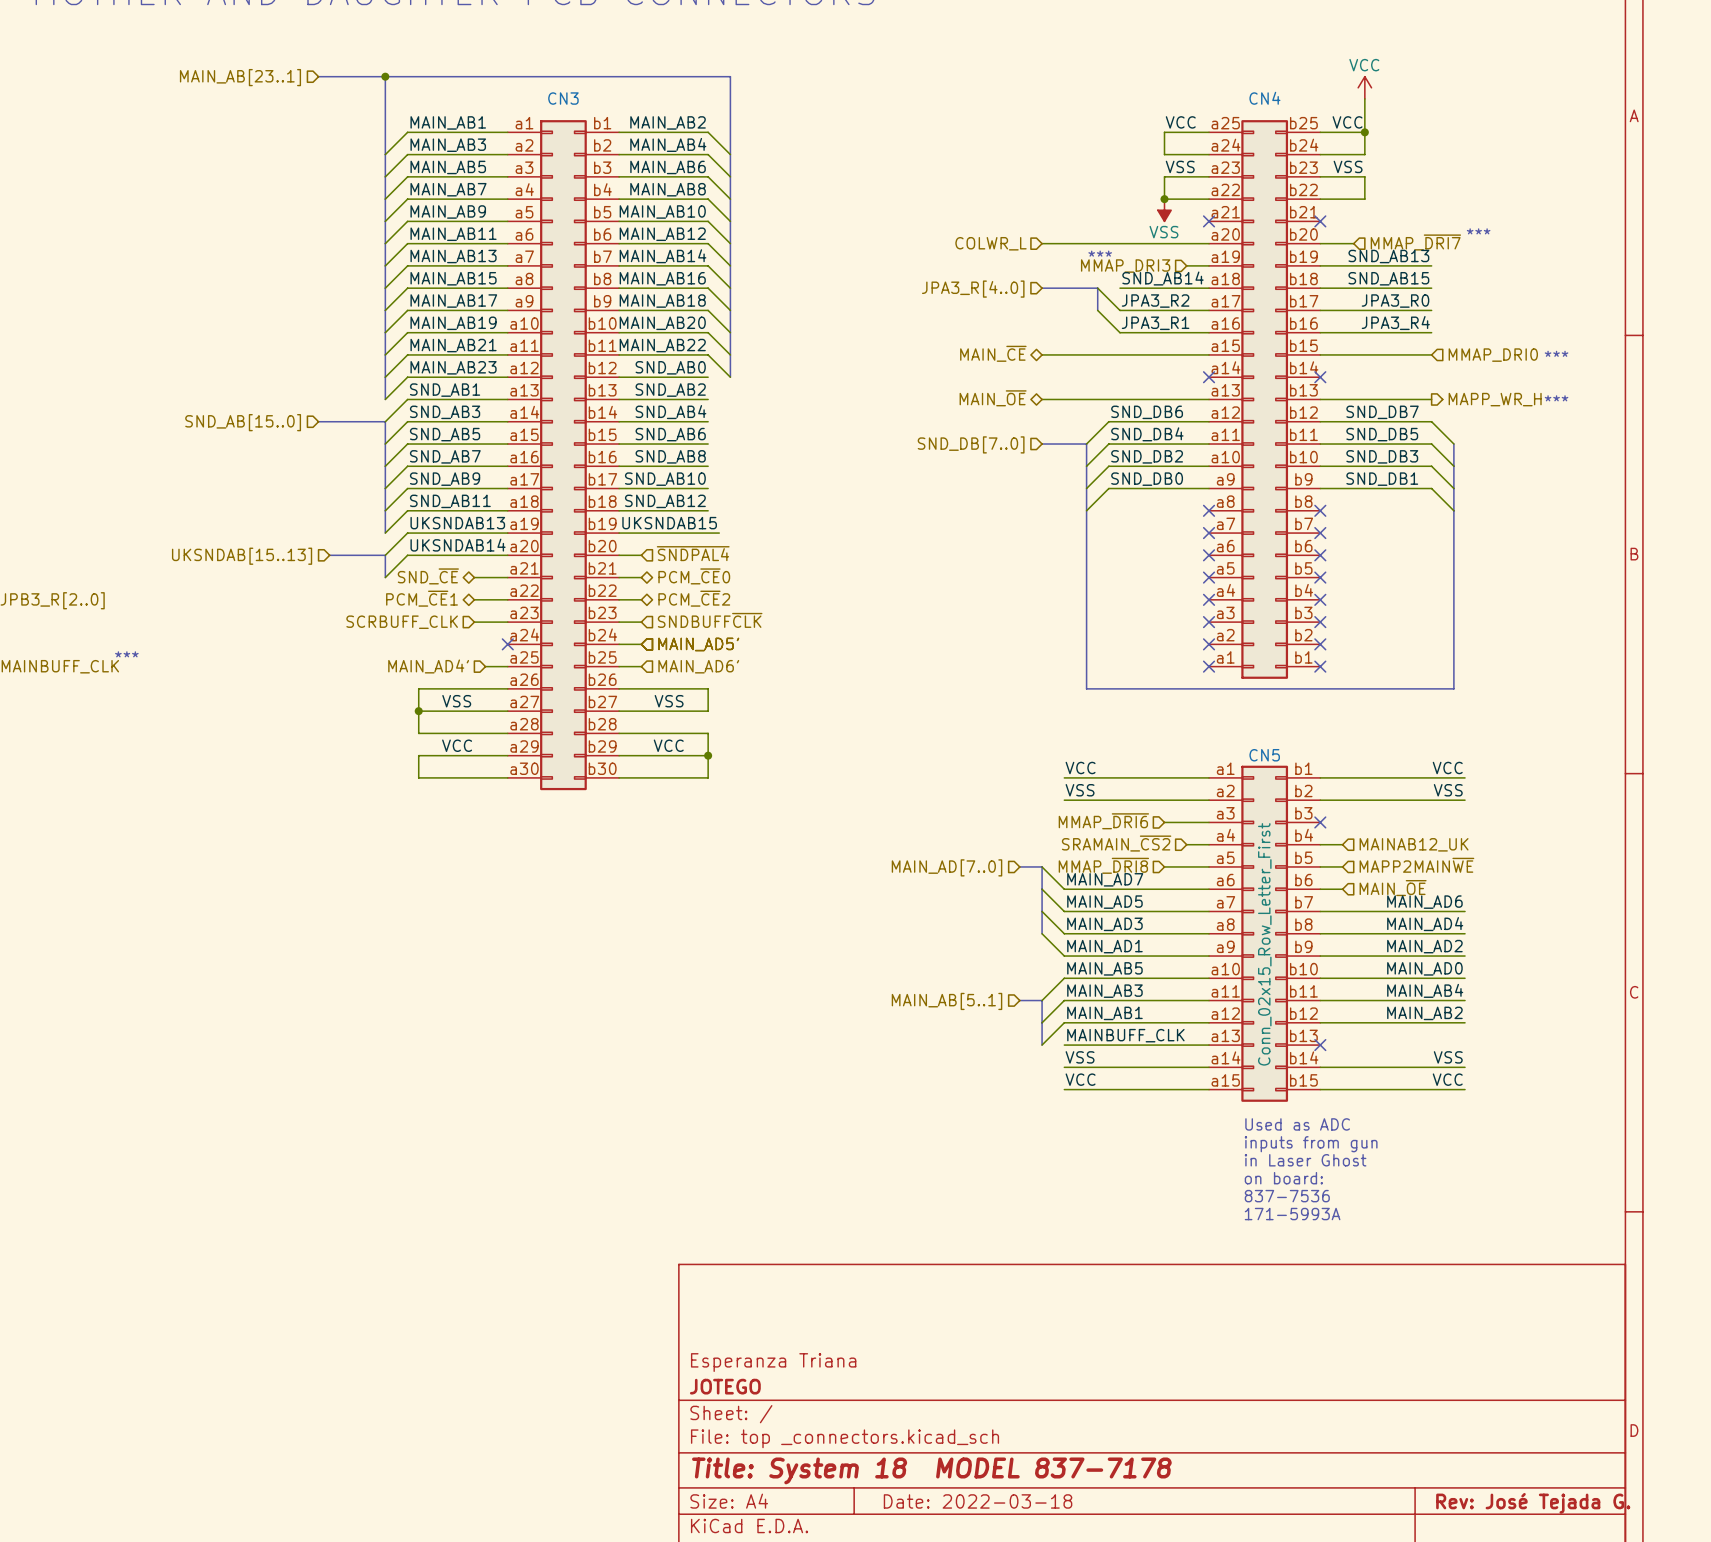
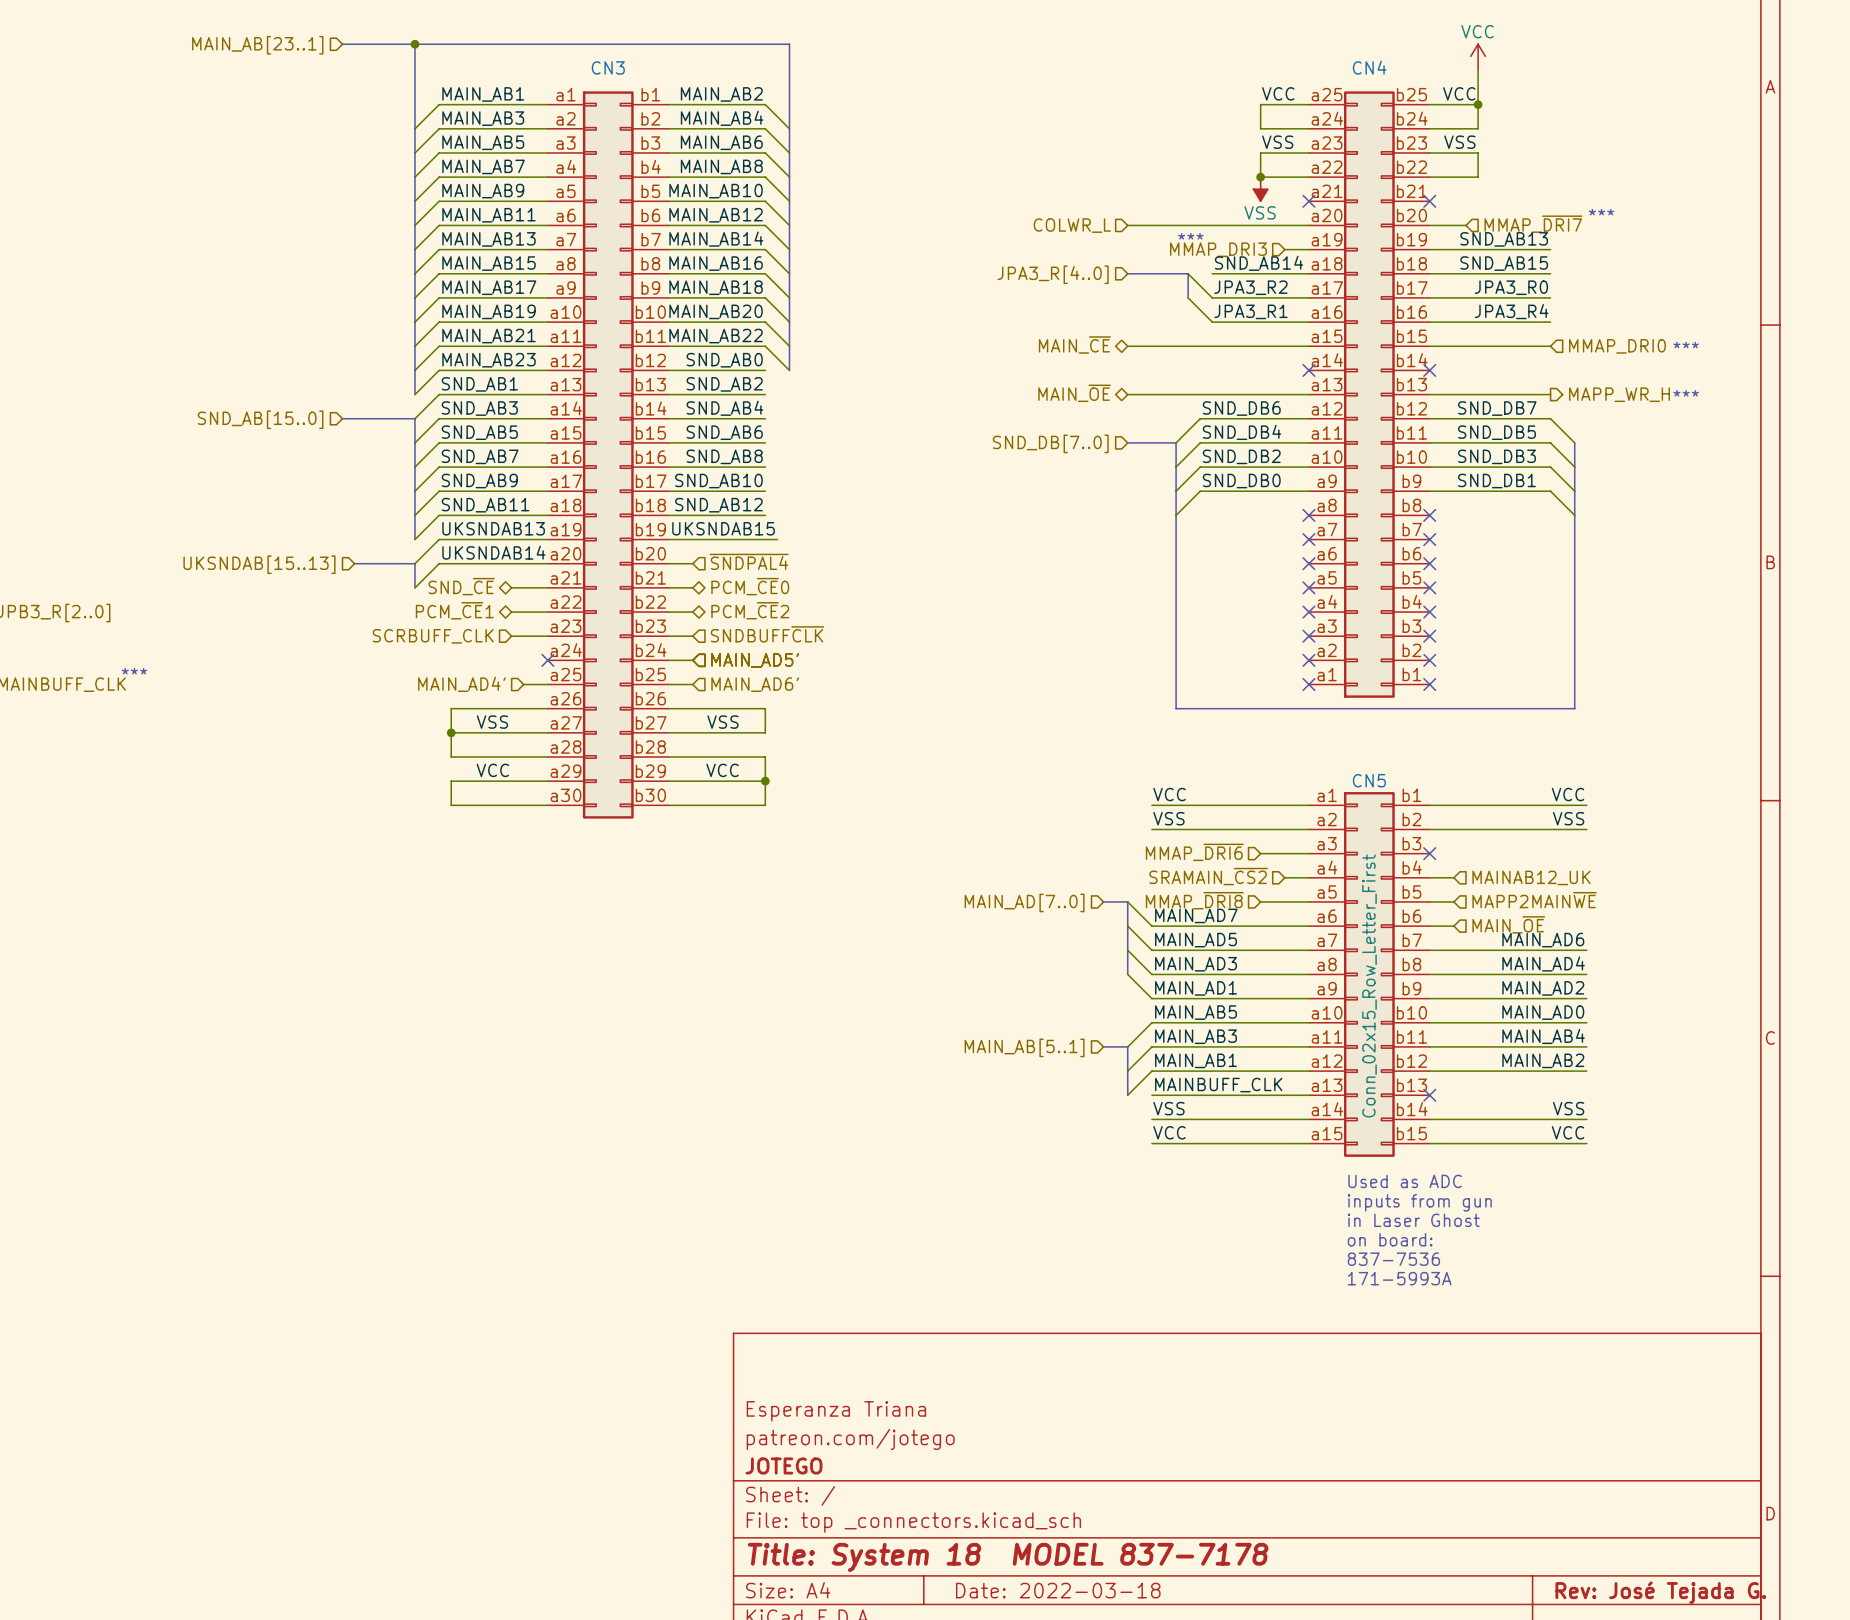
title block: none -> Esperanza Triana (836, 1411)
title block: Esperanza Triana (773, 1362) -> patreon.com/jotego (850, 1439)

